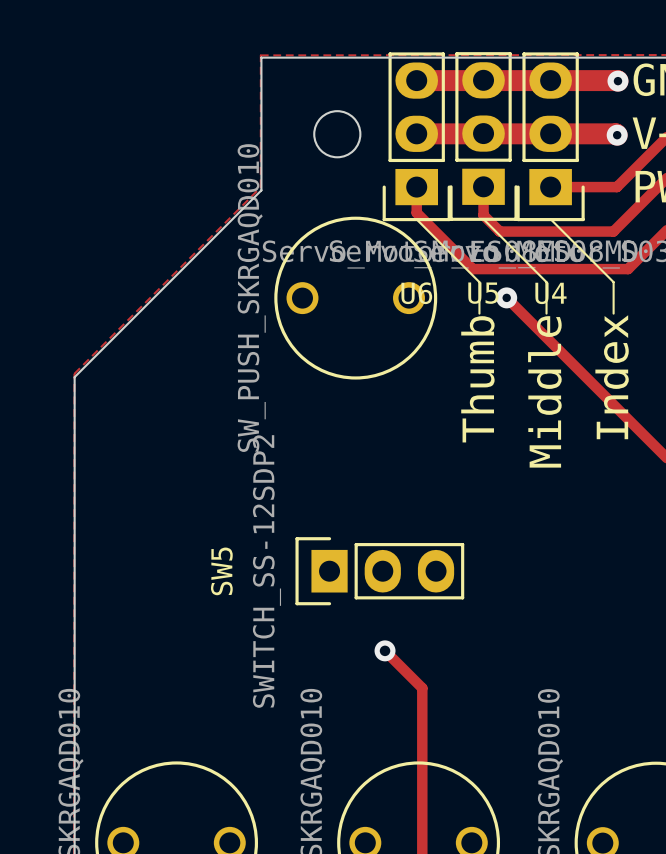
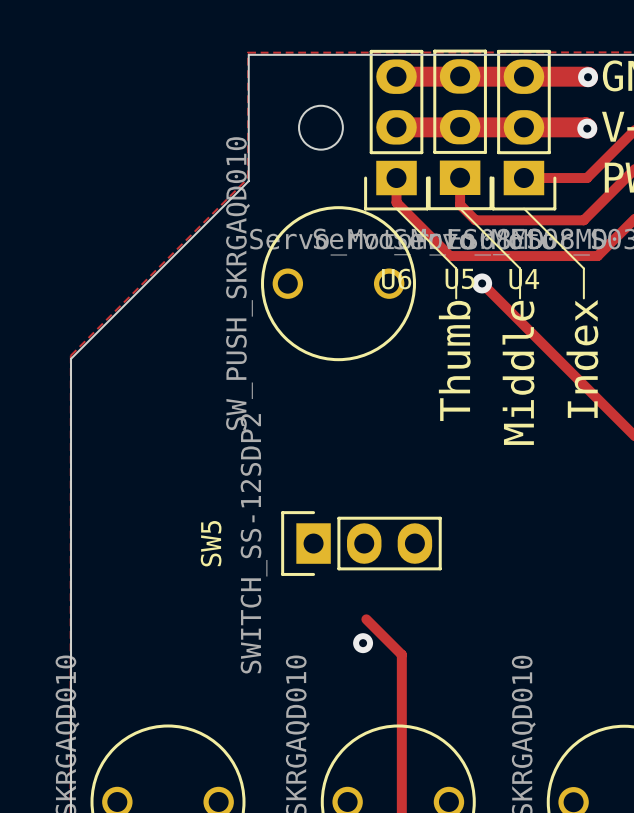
via: (385, 650) -> none
via: none -> (363, 643)

